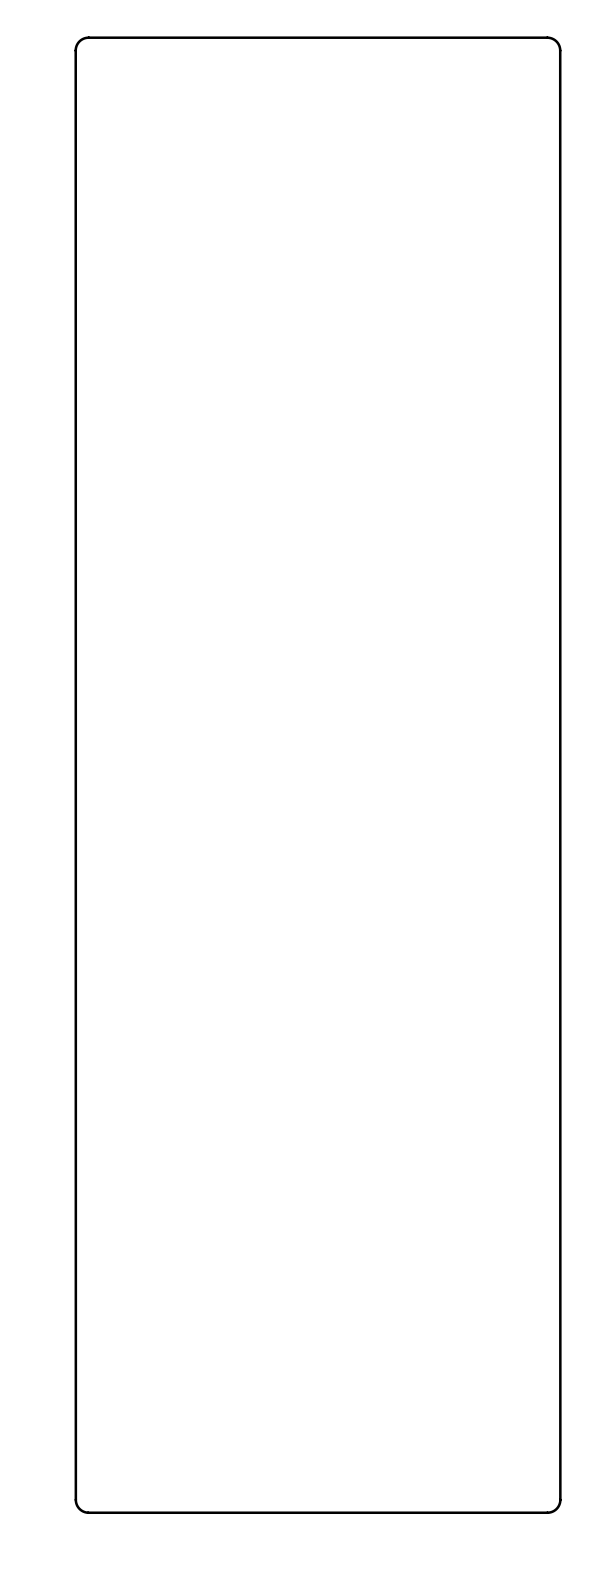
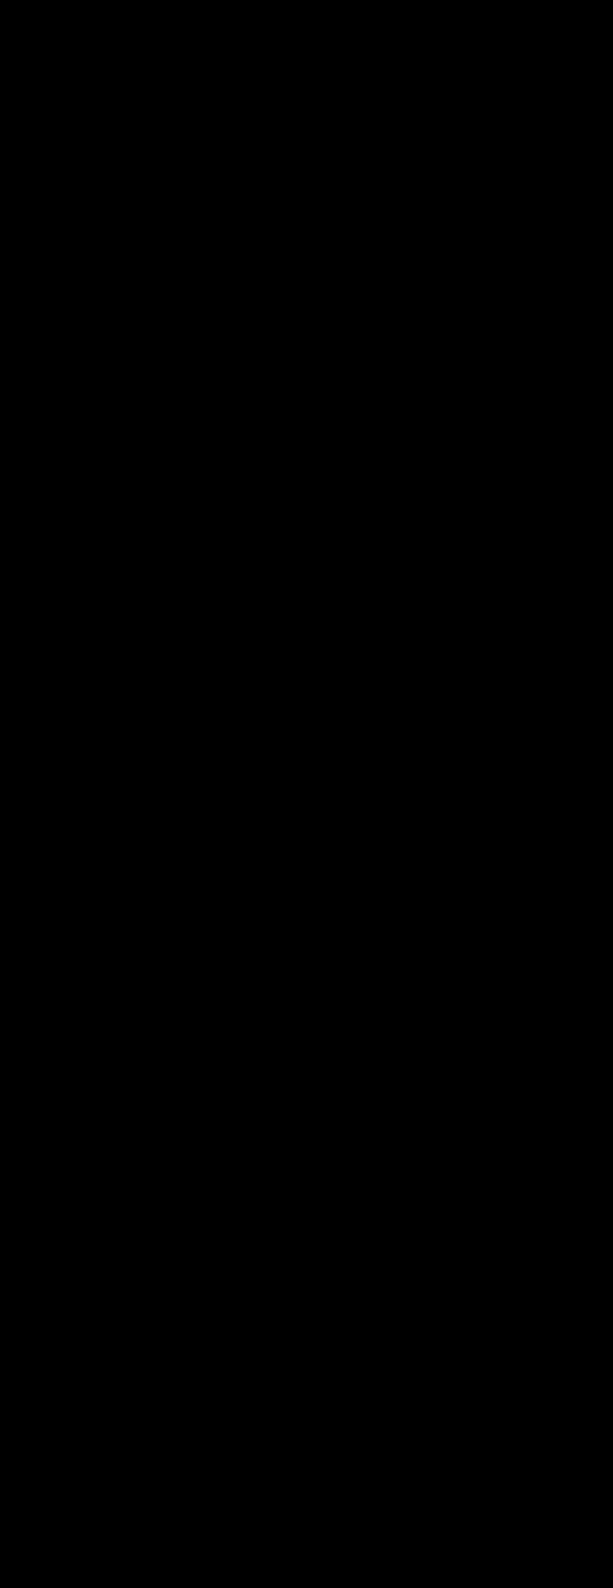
board edge: (88, 37) (547, 37) (555, 40) (559, 47) (560, 1499) (557, 1507) (550, 1512) (88, 1512) (80, 1509) (76, 1503) (75, 50) (79, 41) (88, 37) -> none

